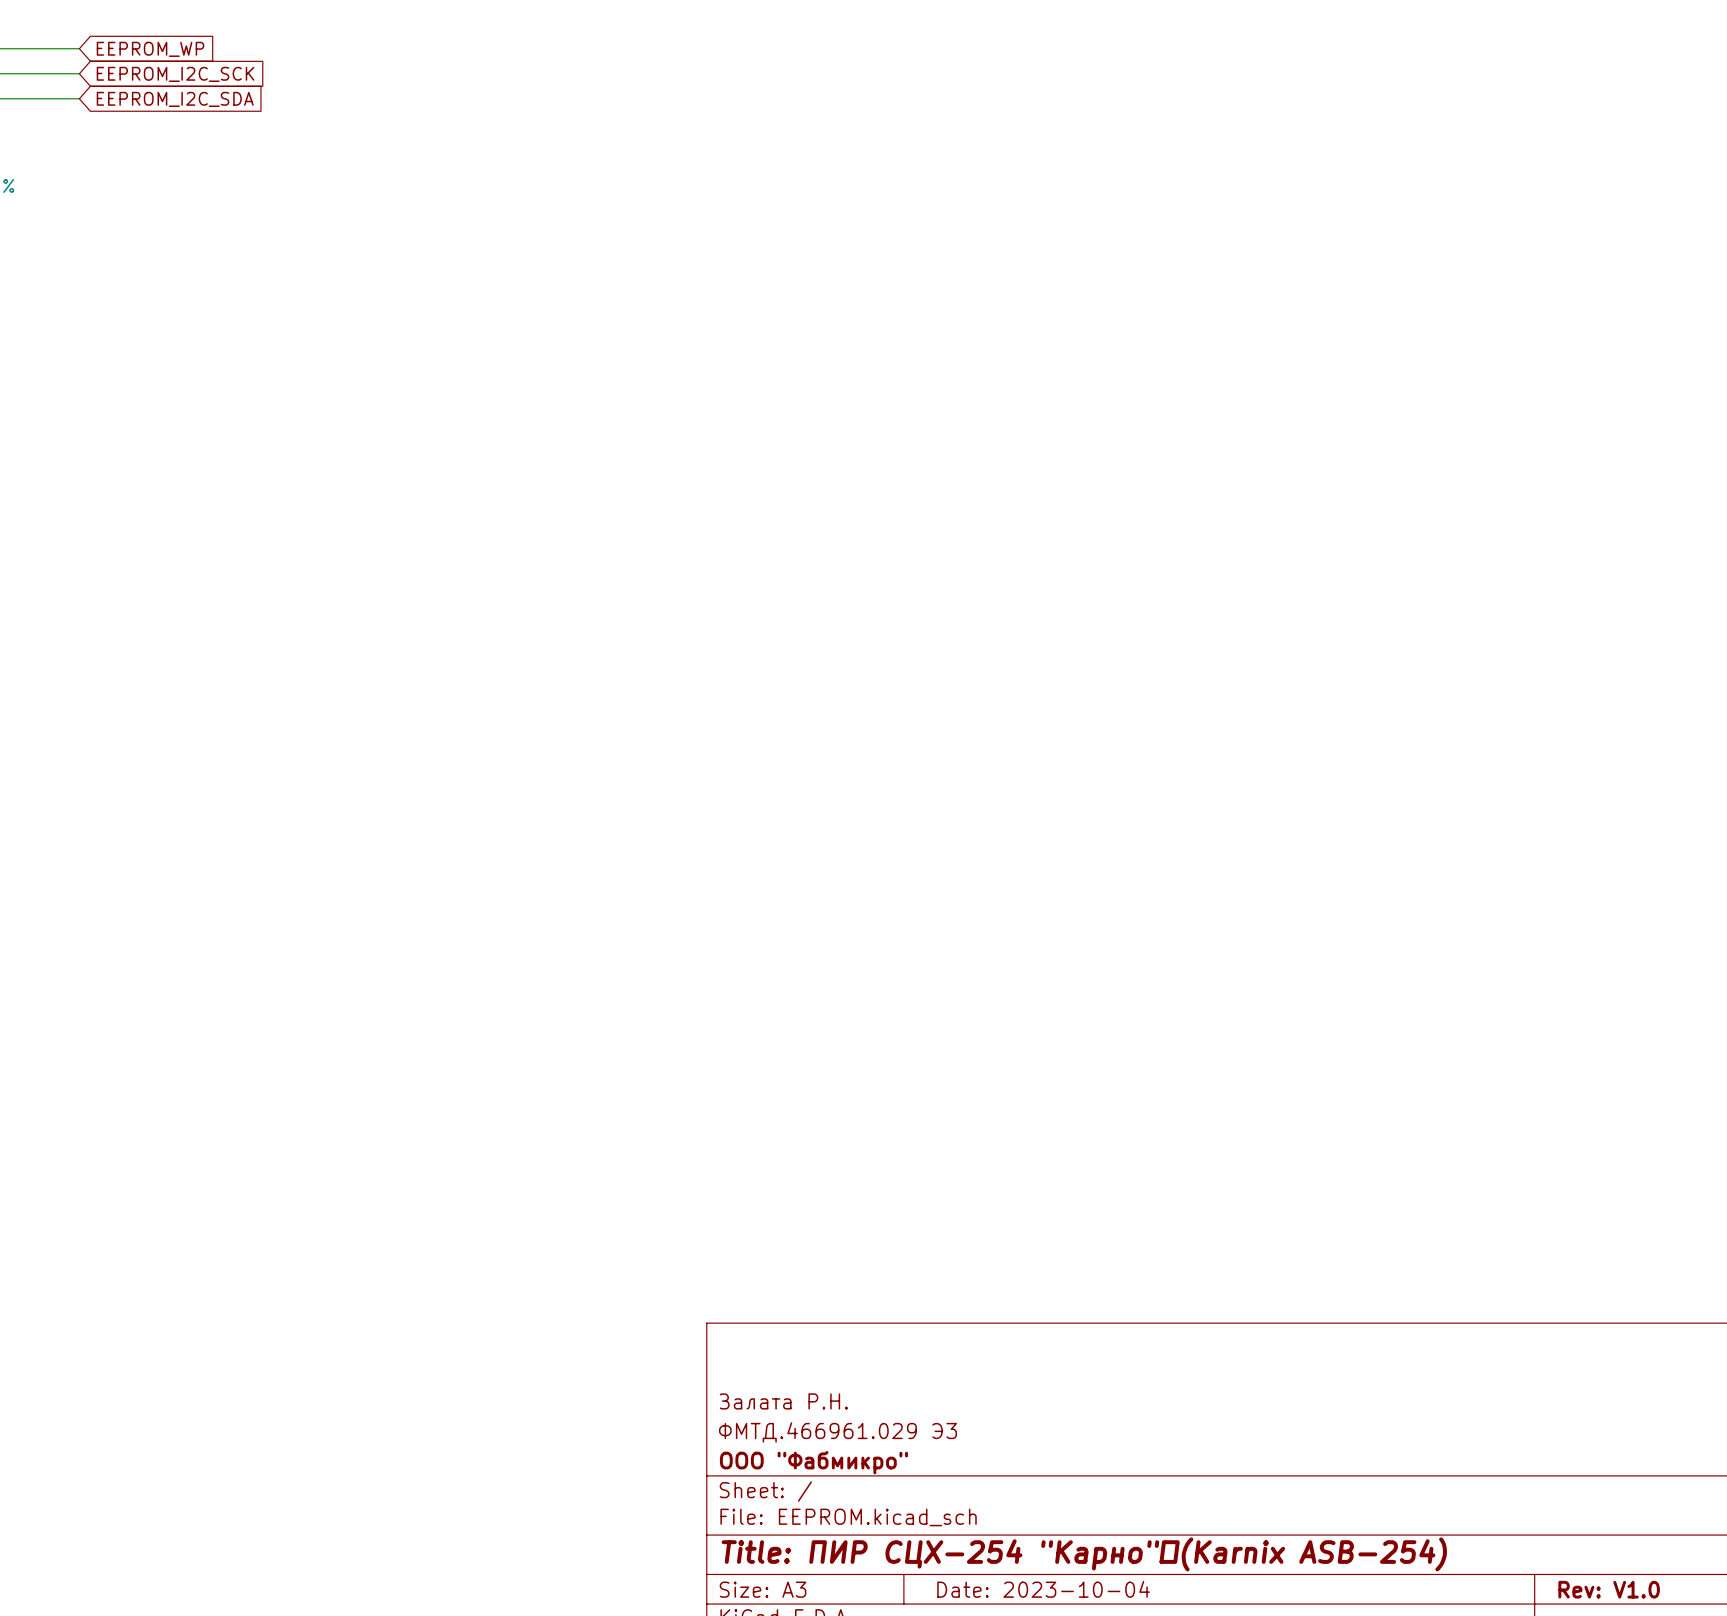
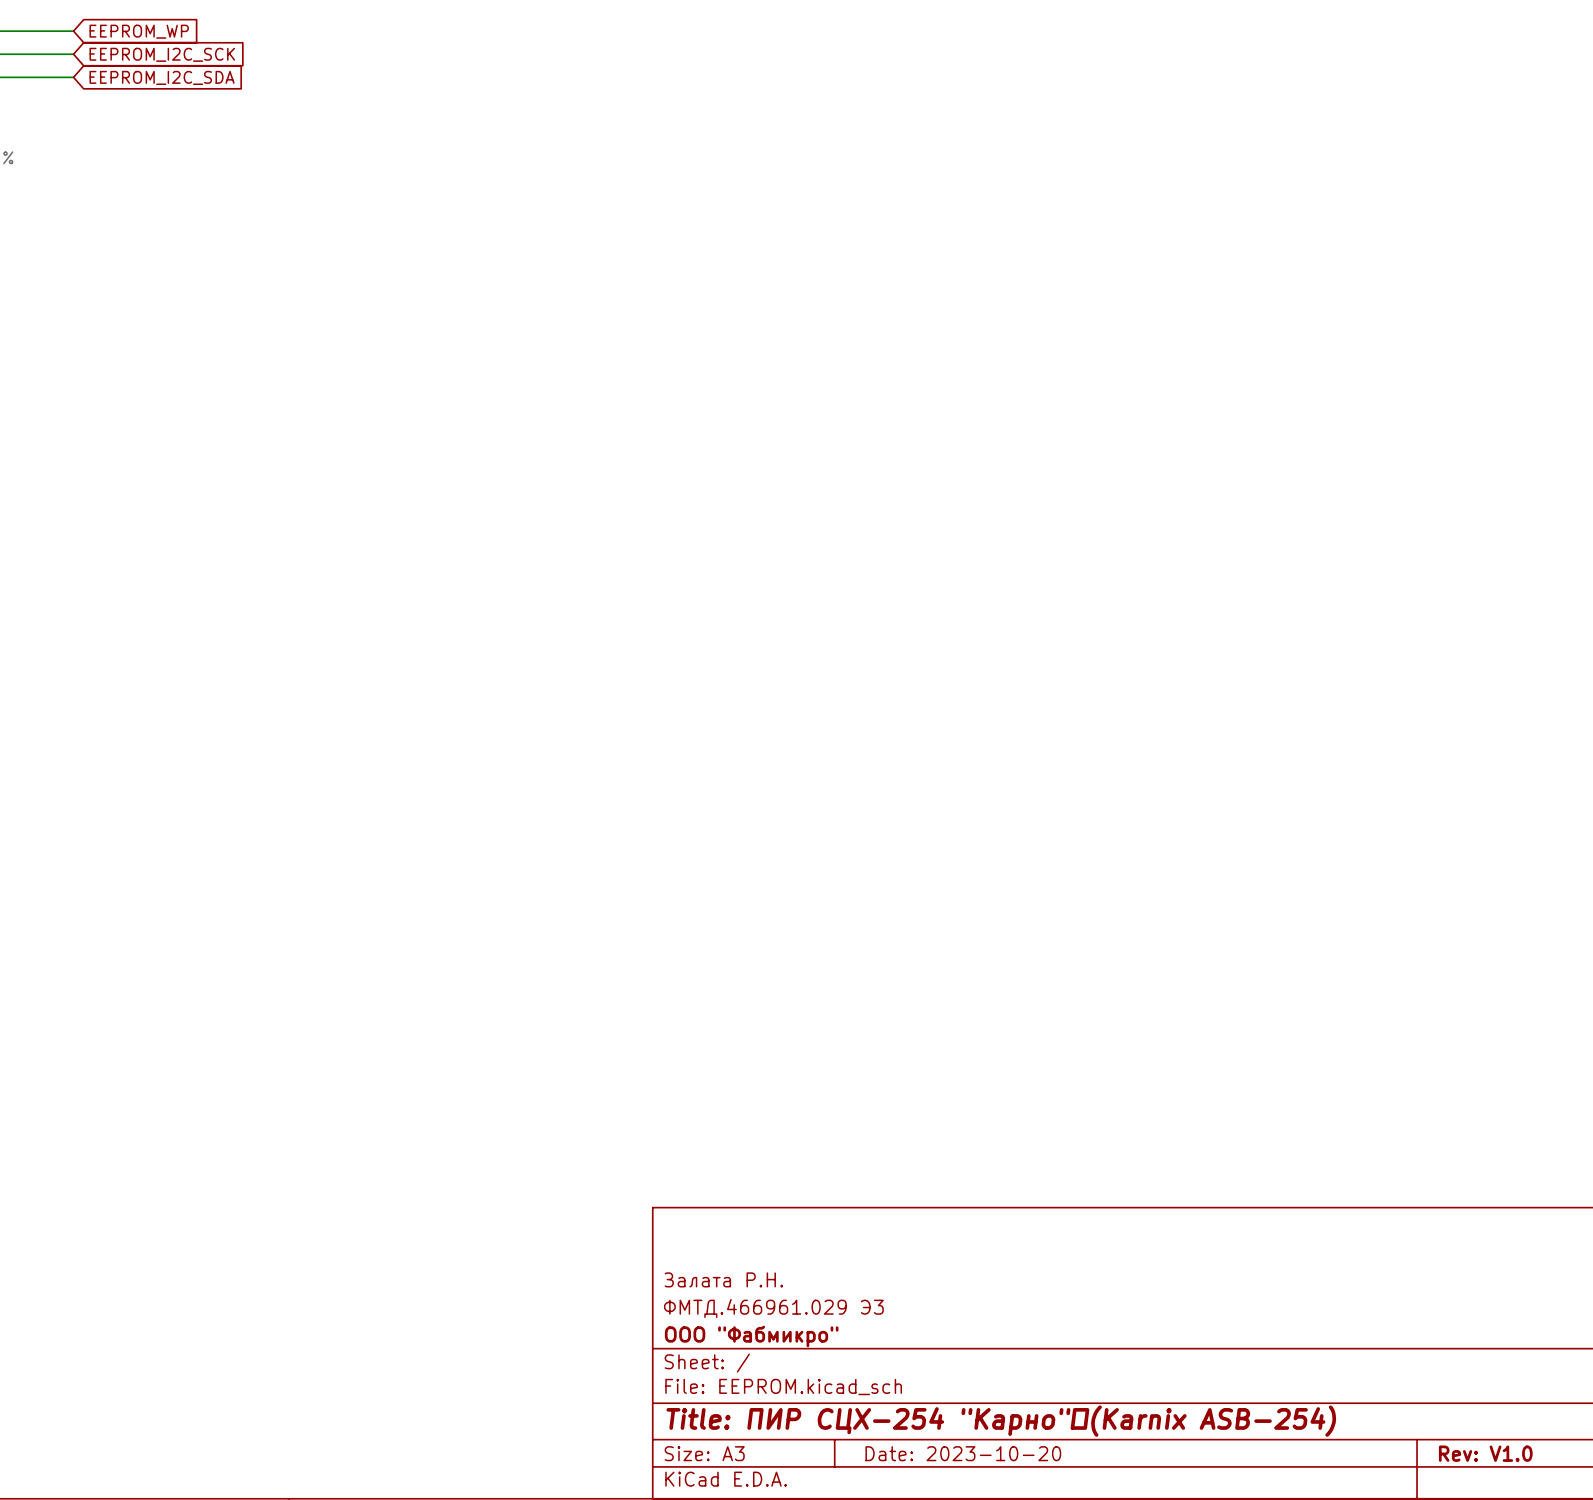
title block: Date: 2023-10-04 (1043, 1589) -> Date: 2023-10-20 (963, 1453)

